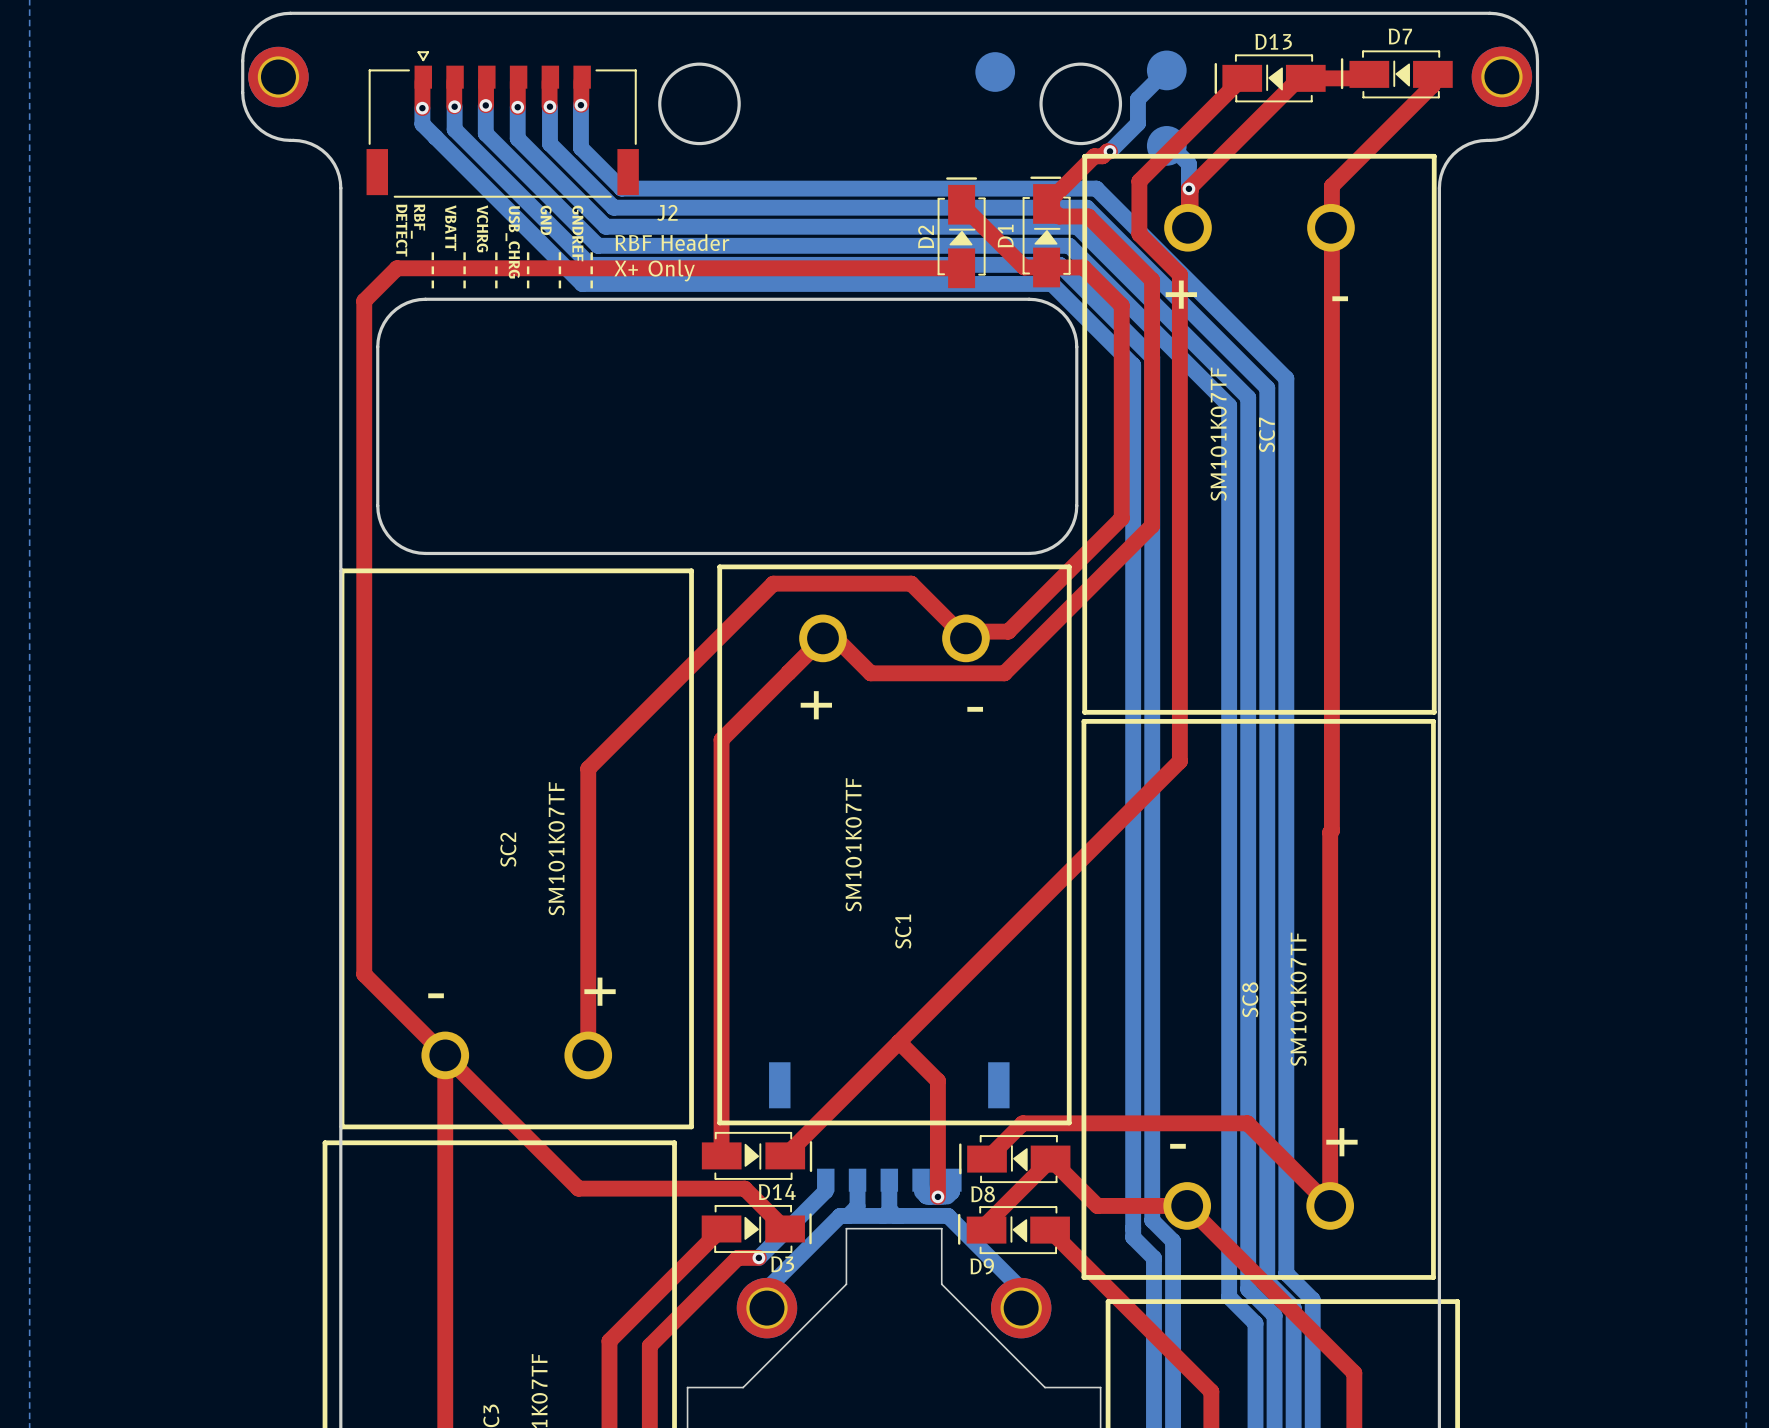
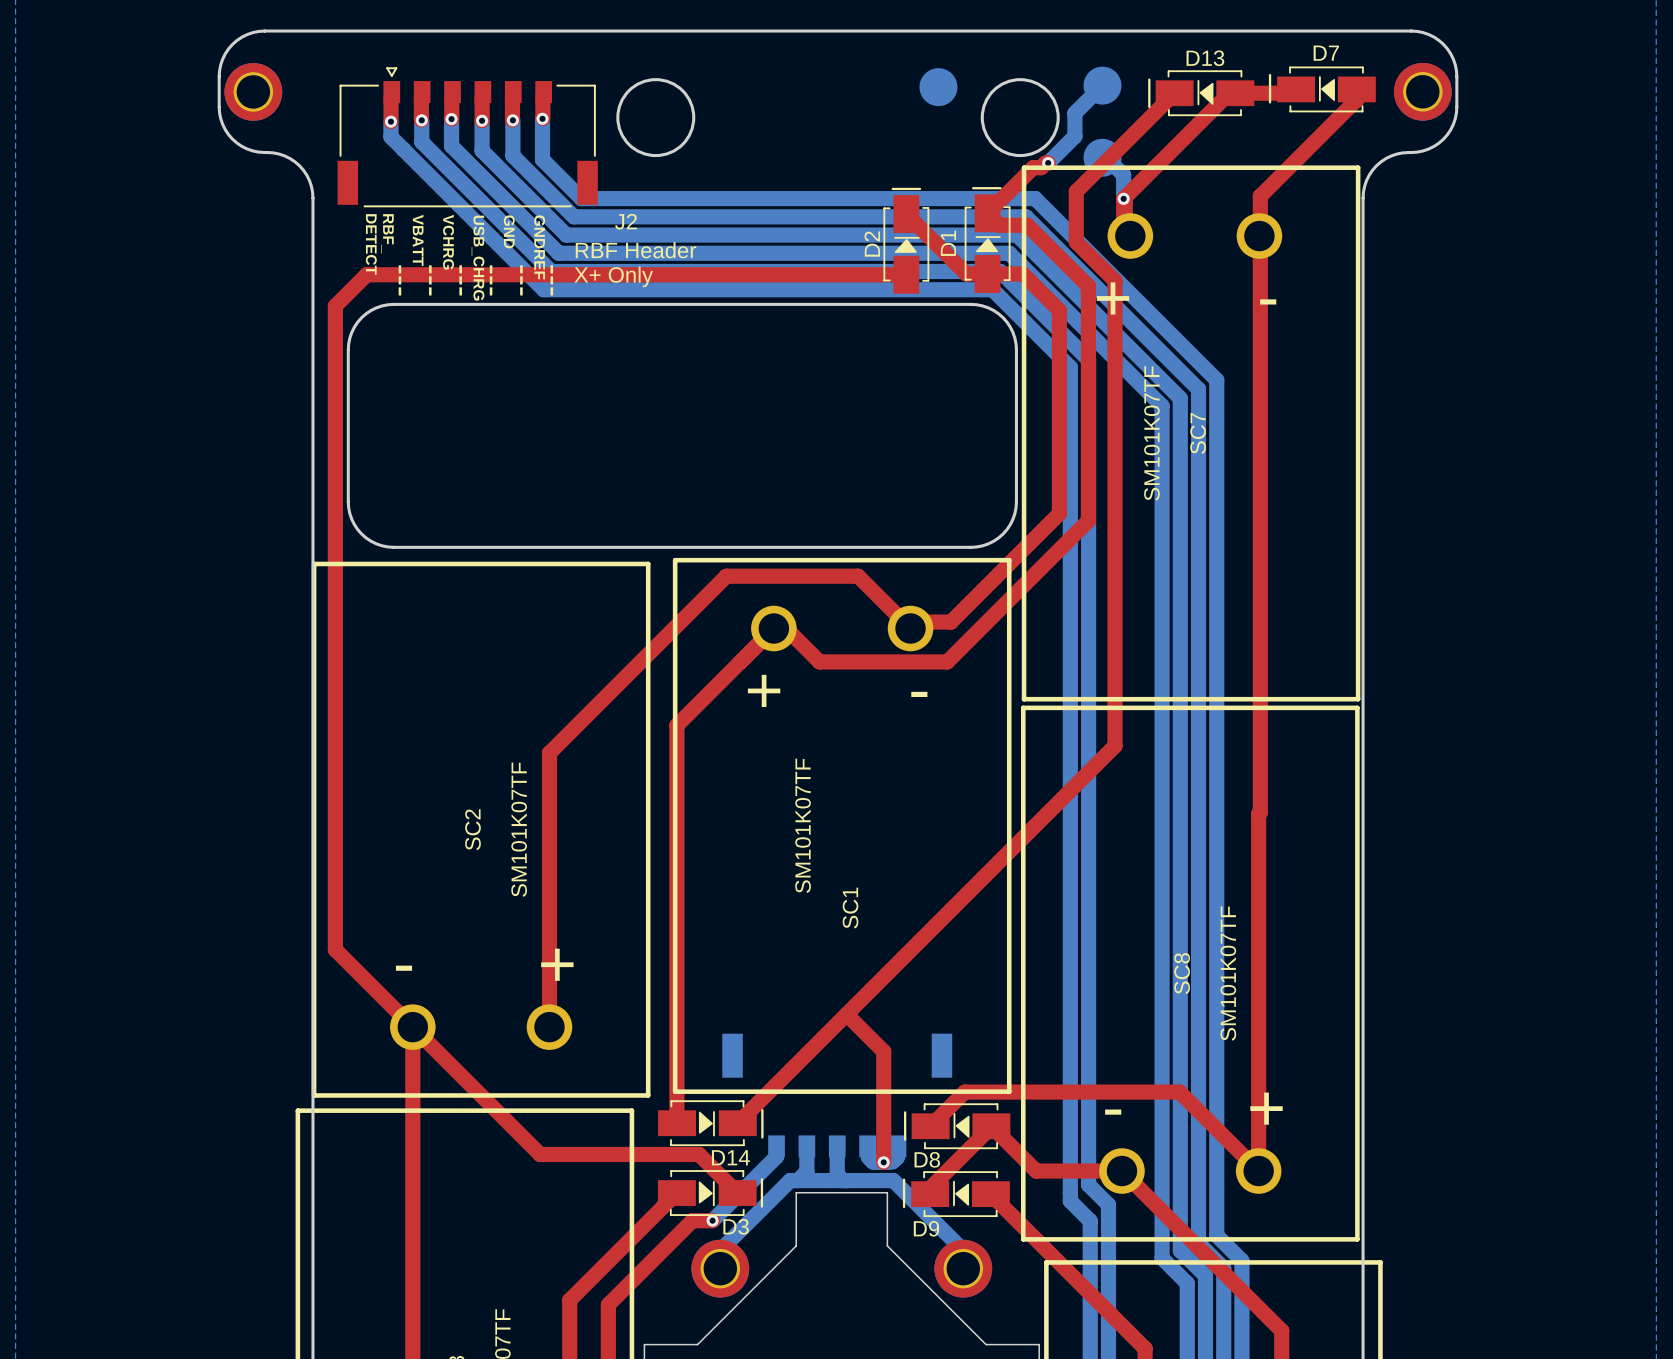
SC7 footprint: [1082, 153, 1437, 715] -> [1021, 165, 1361, 702]

